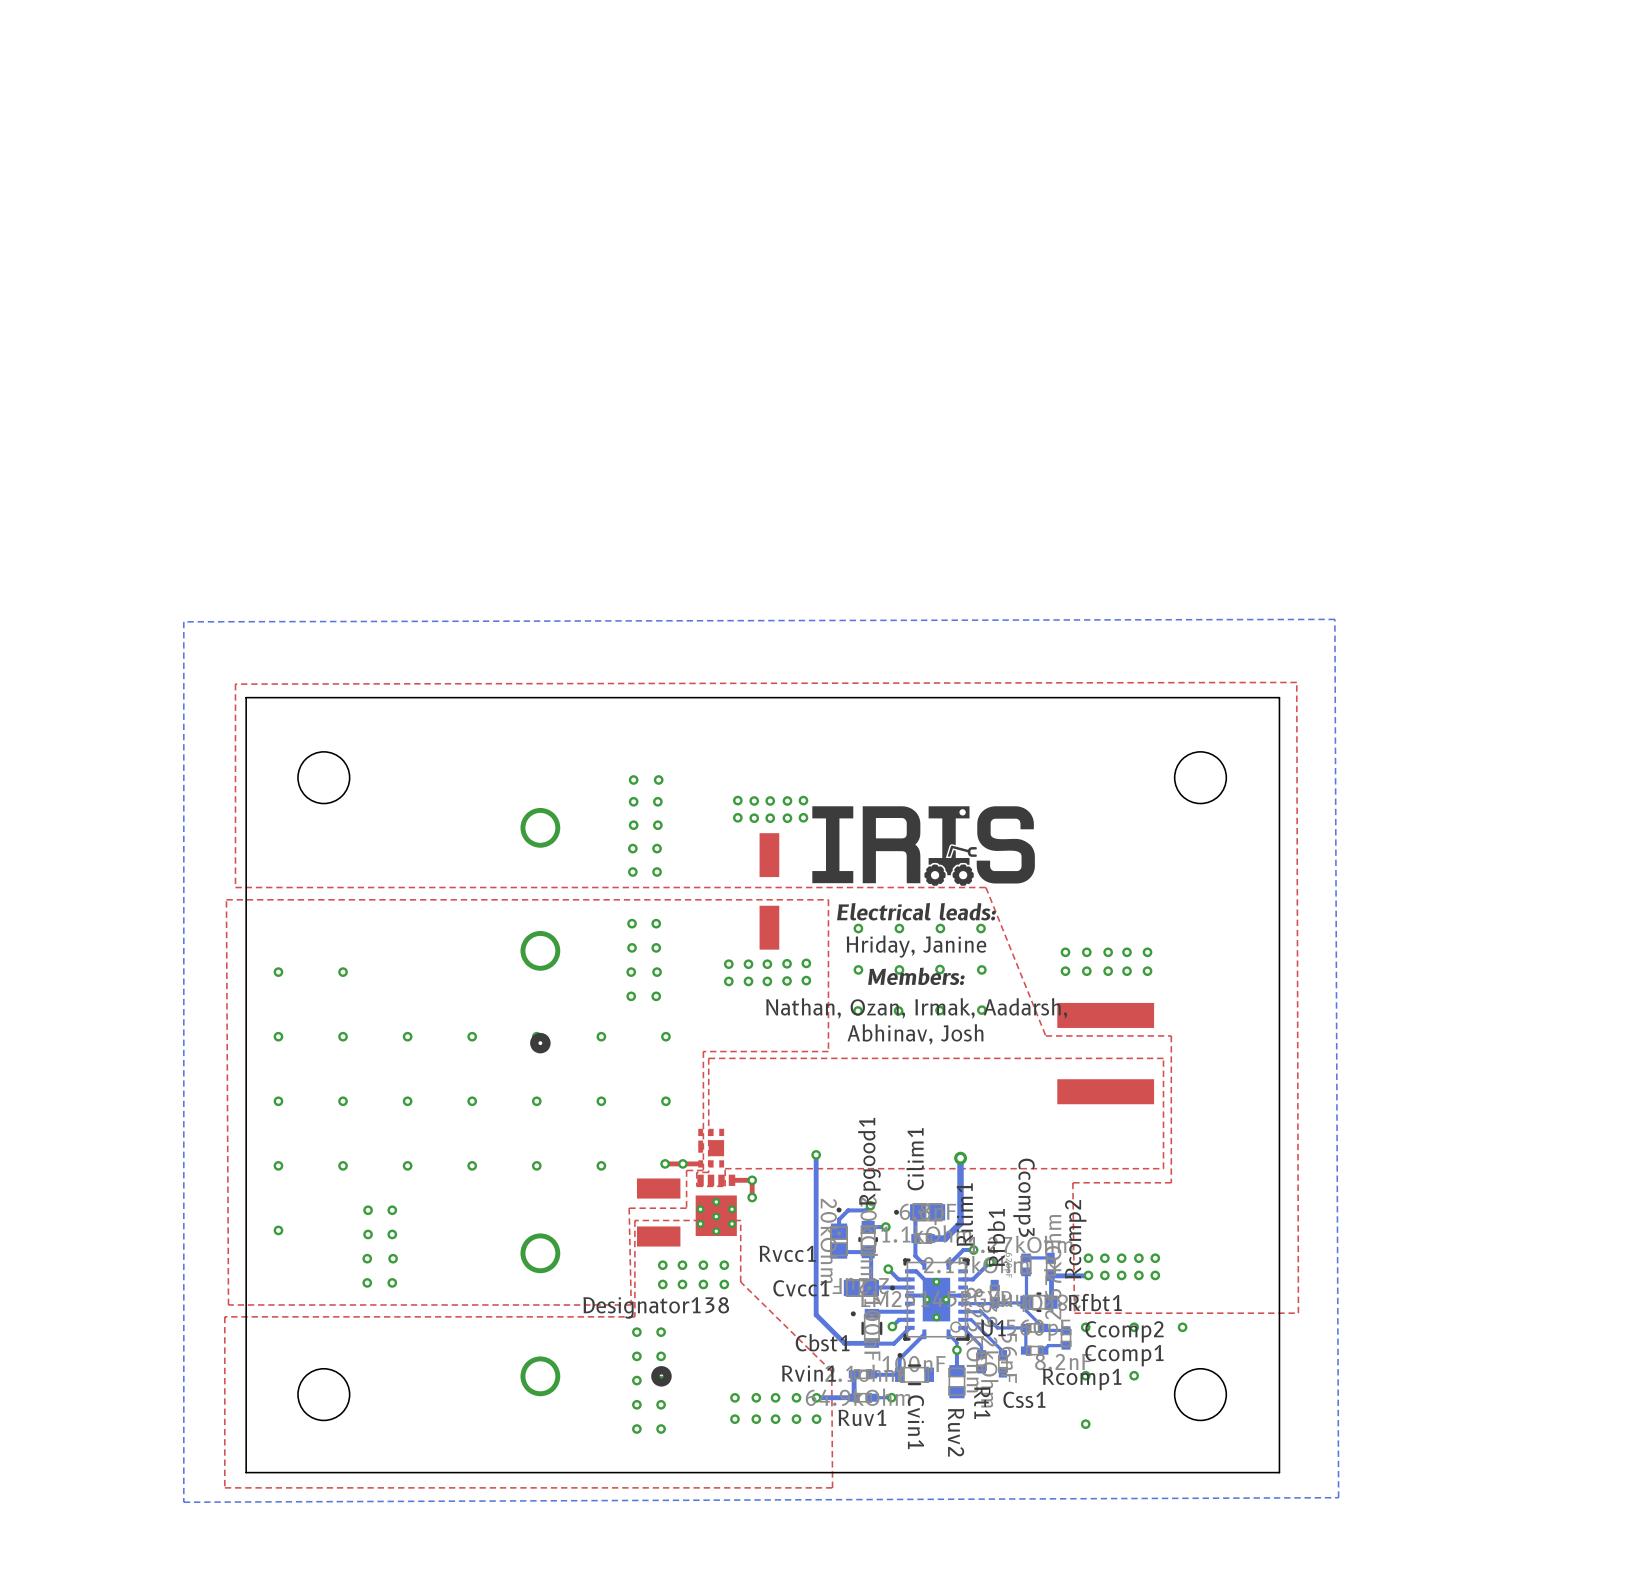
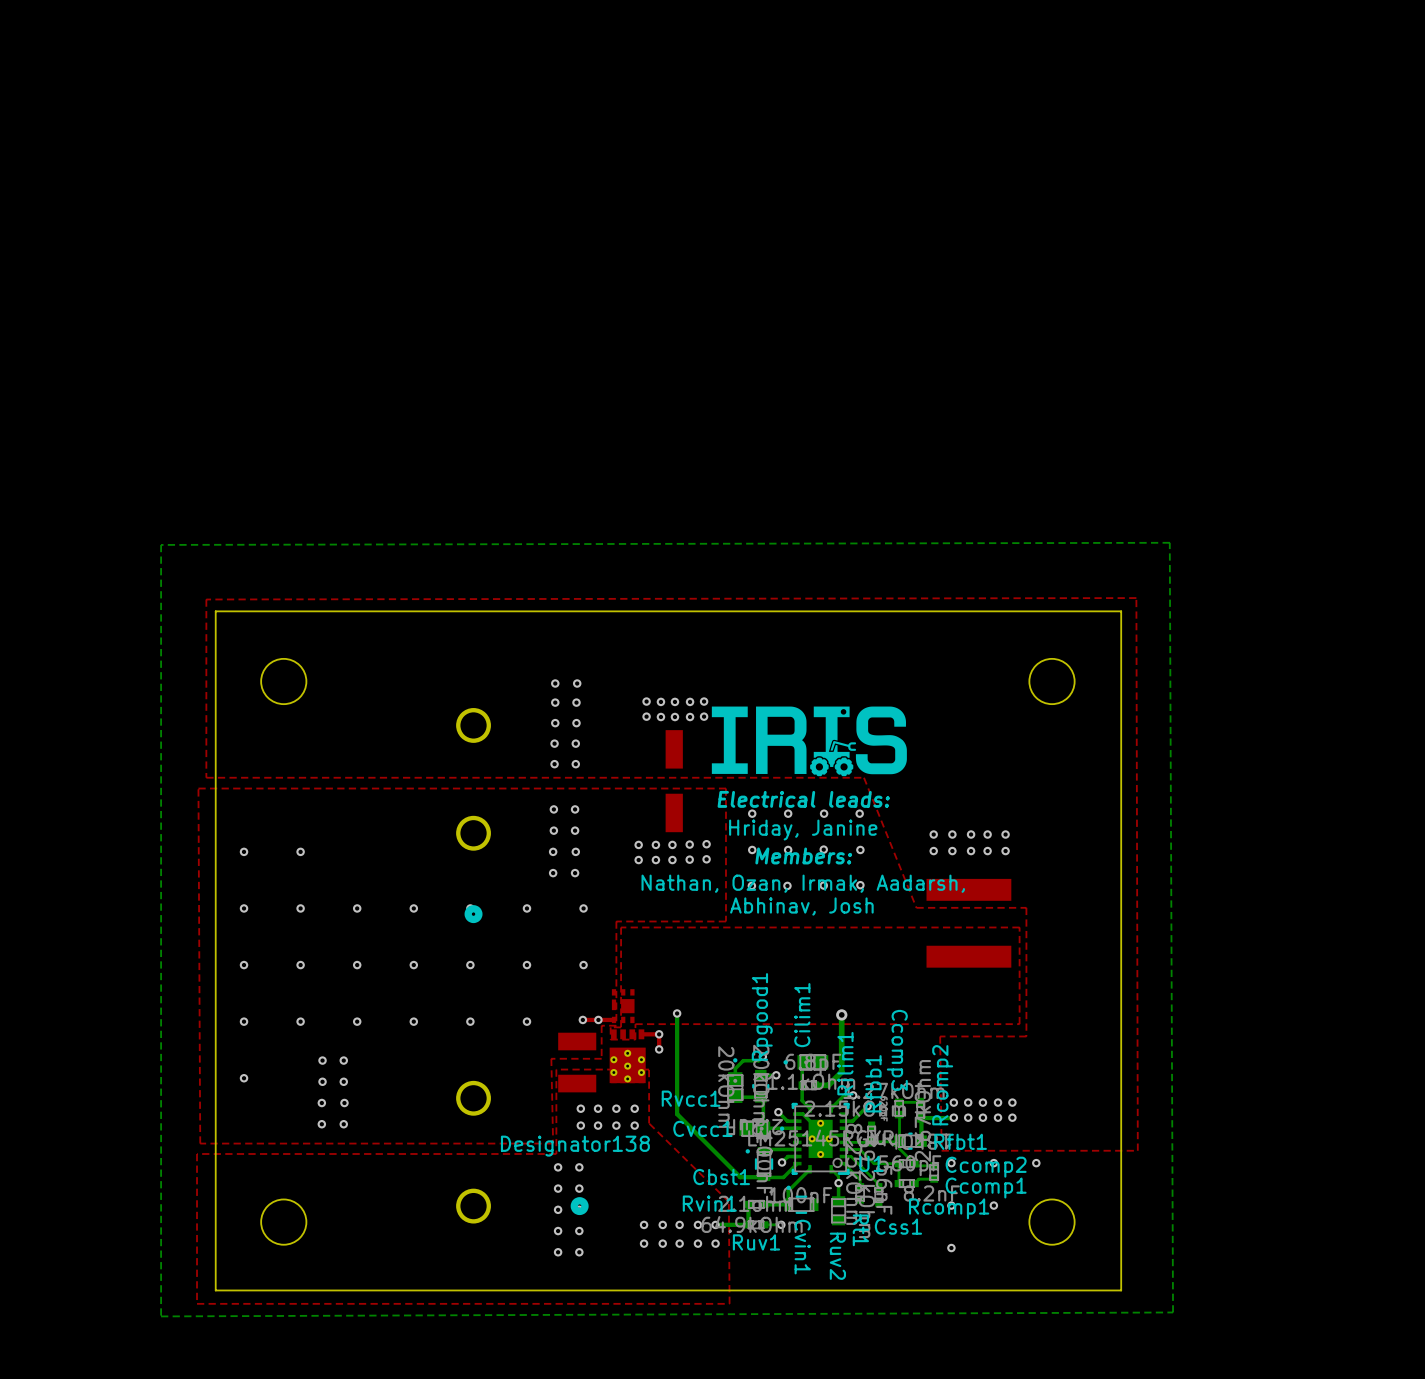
bottom track: (816, 1154) (816, 1314) -> (677, 1013) (677, 1114) (715, 1152)
via position: (816, 1154) -> (677, 1013)

